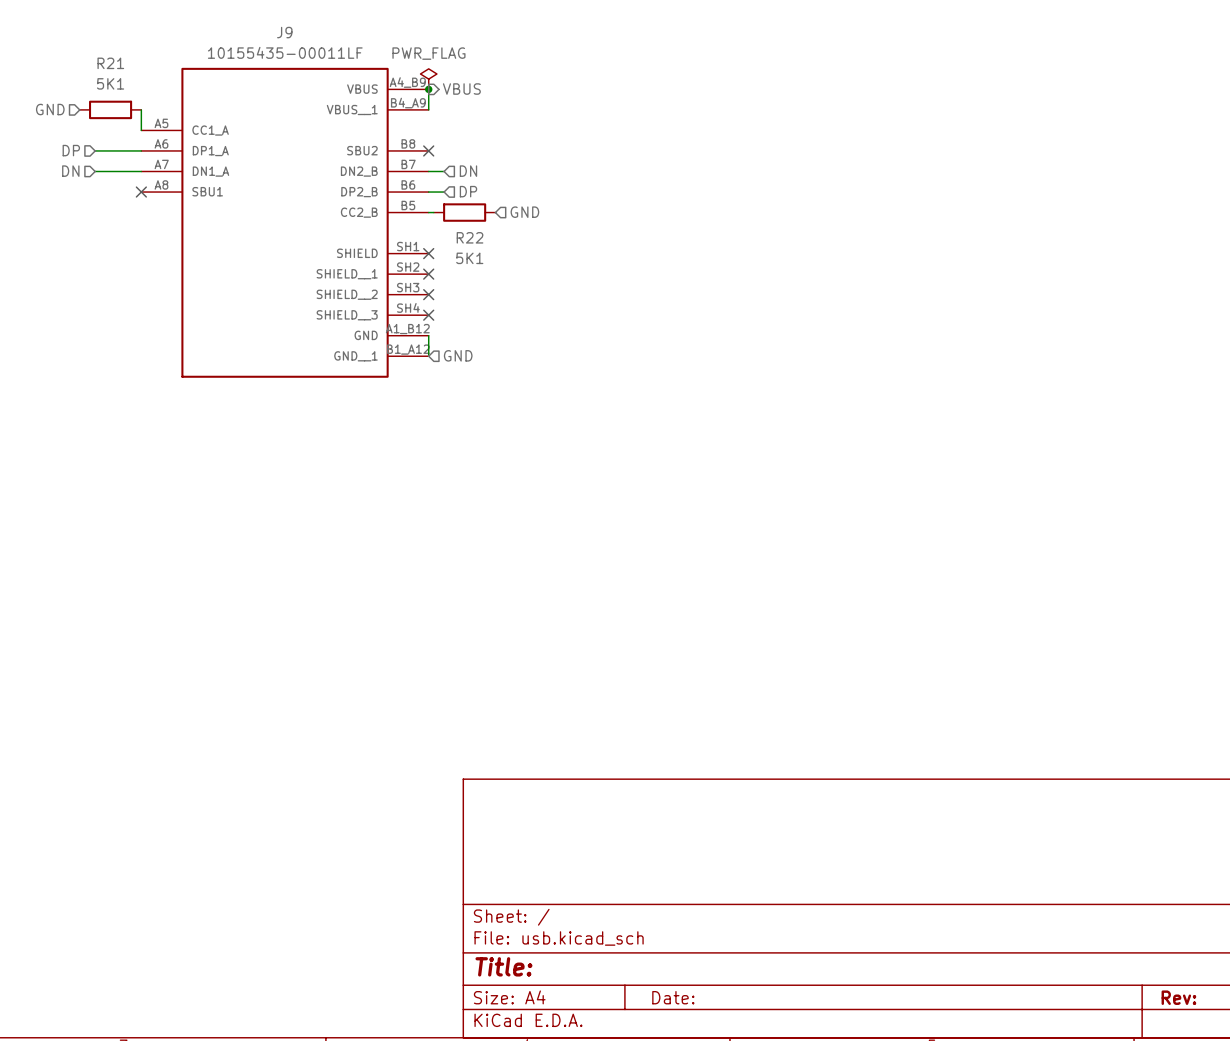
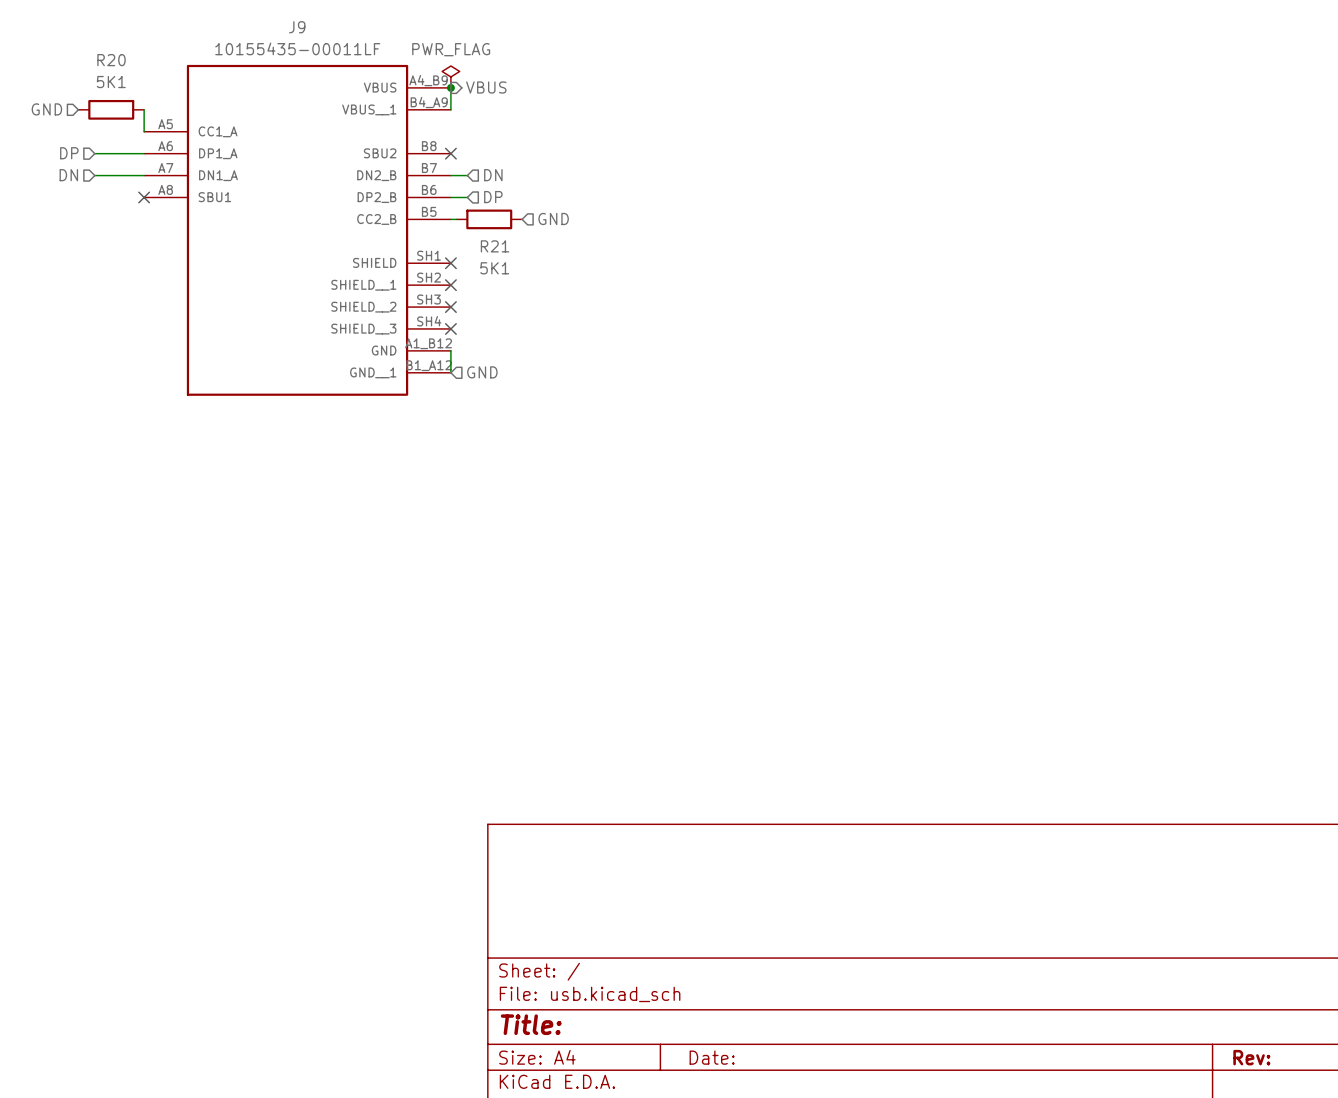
R21 name: R21 (110, 63) -> R20 (111, 60)
R22 name: R22 (470, 237) -> R21 (495, 246)

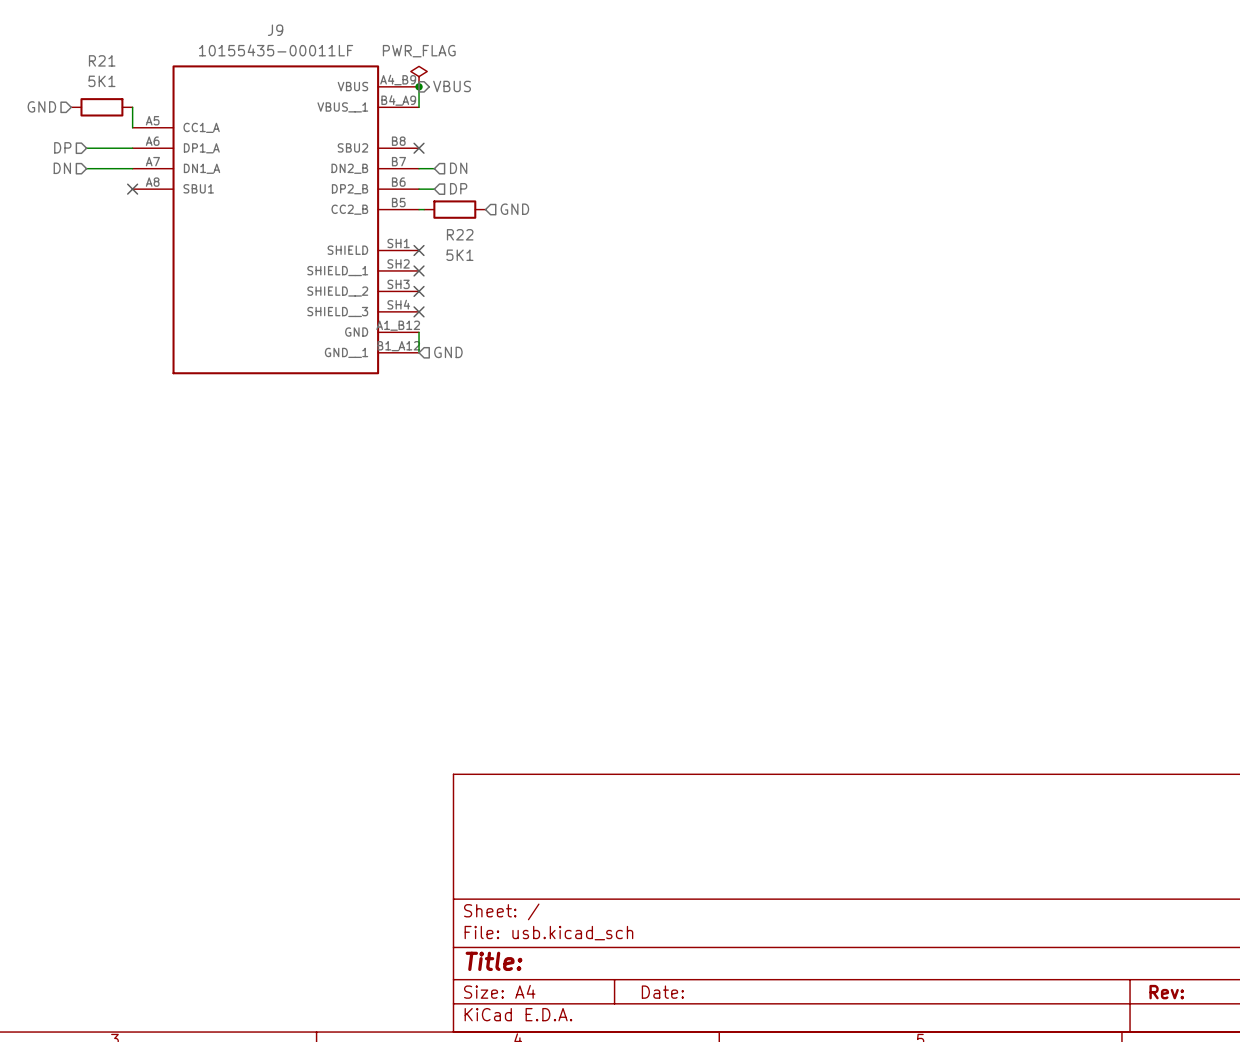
R20 name: R20 (111, 60) -> R21 (102, 60)
R21 name: R21 (495, 246) -> R22 (460, 234)

